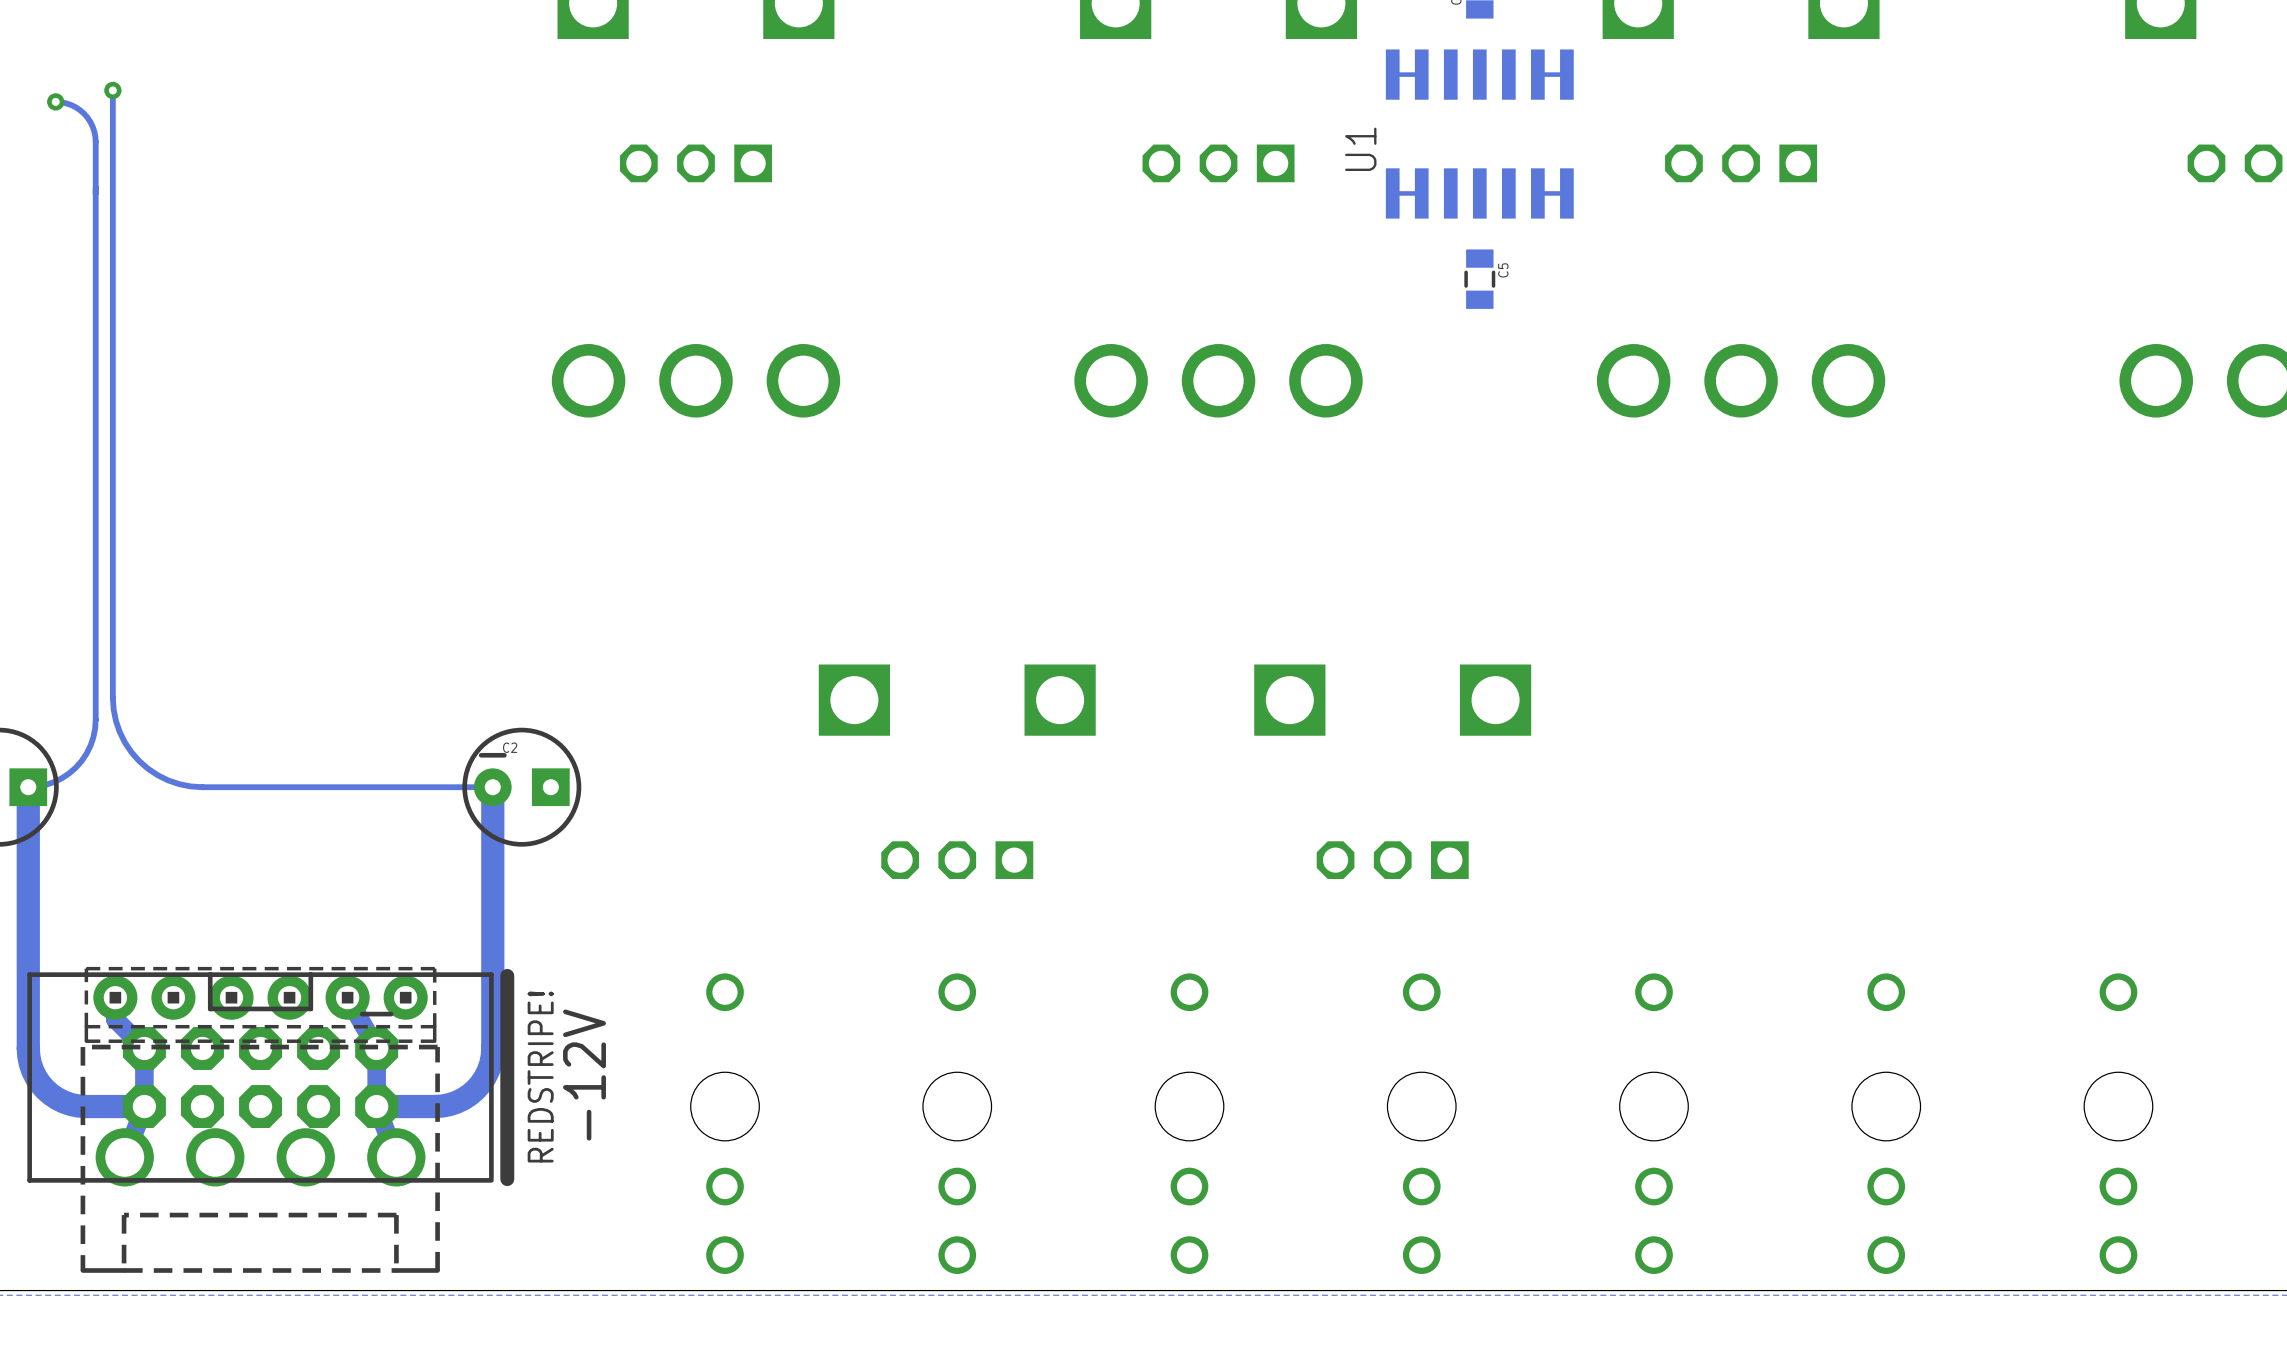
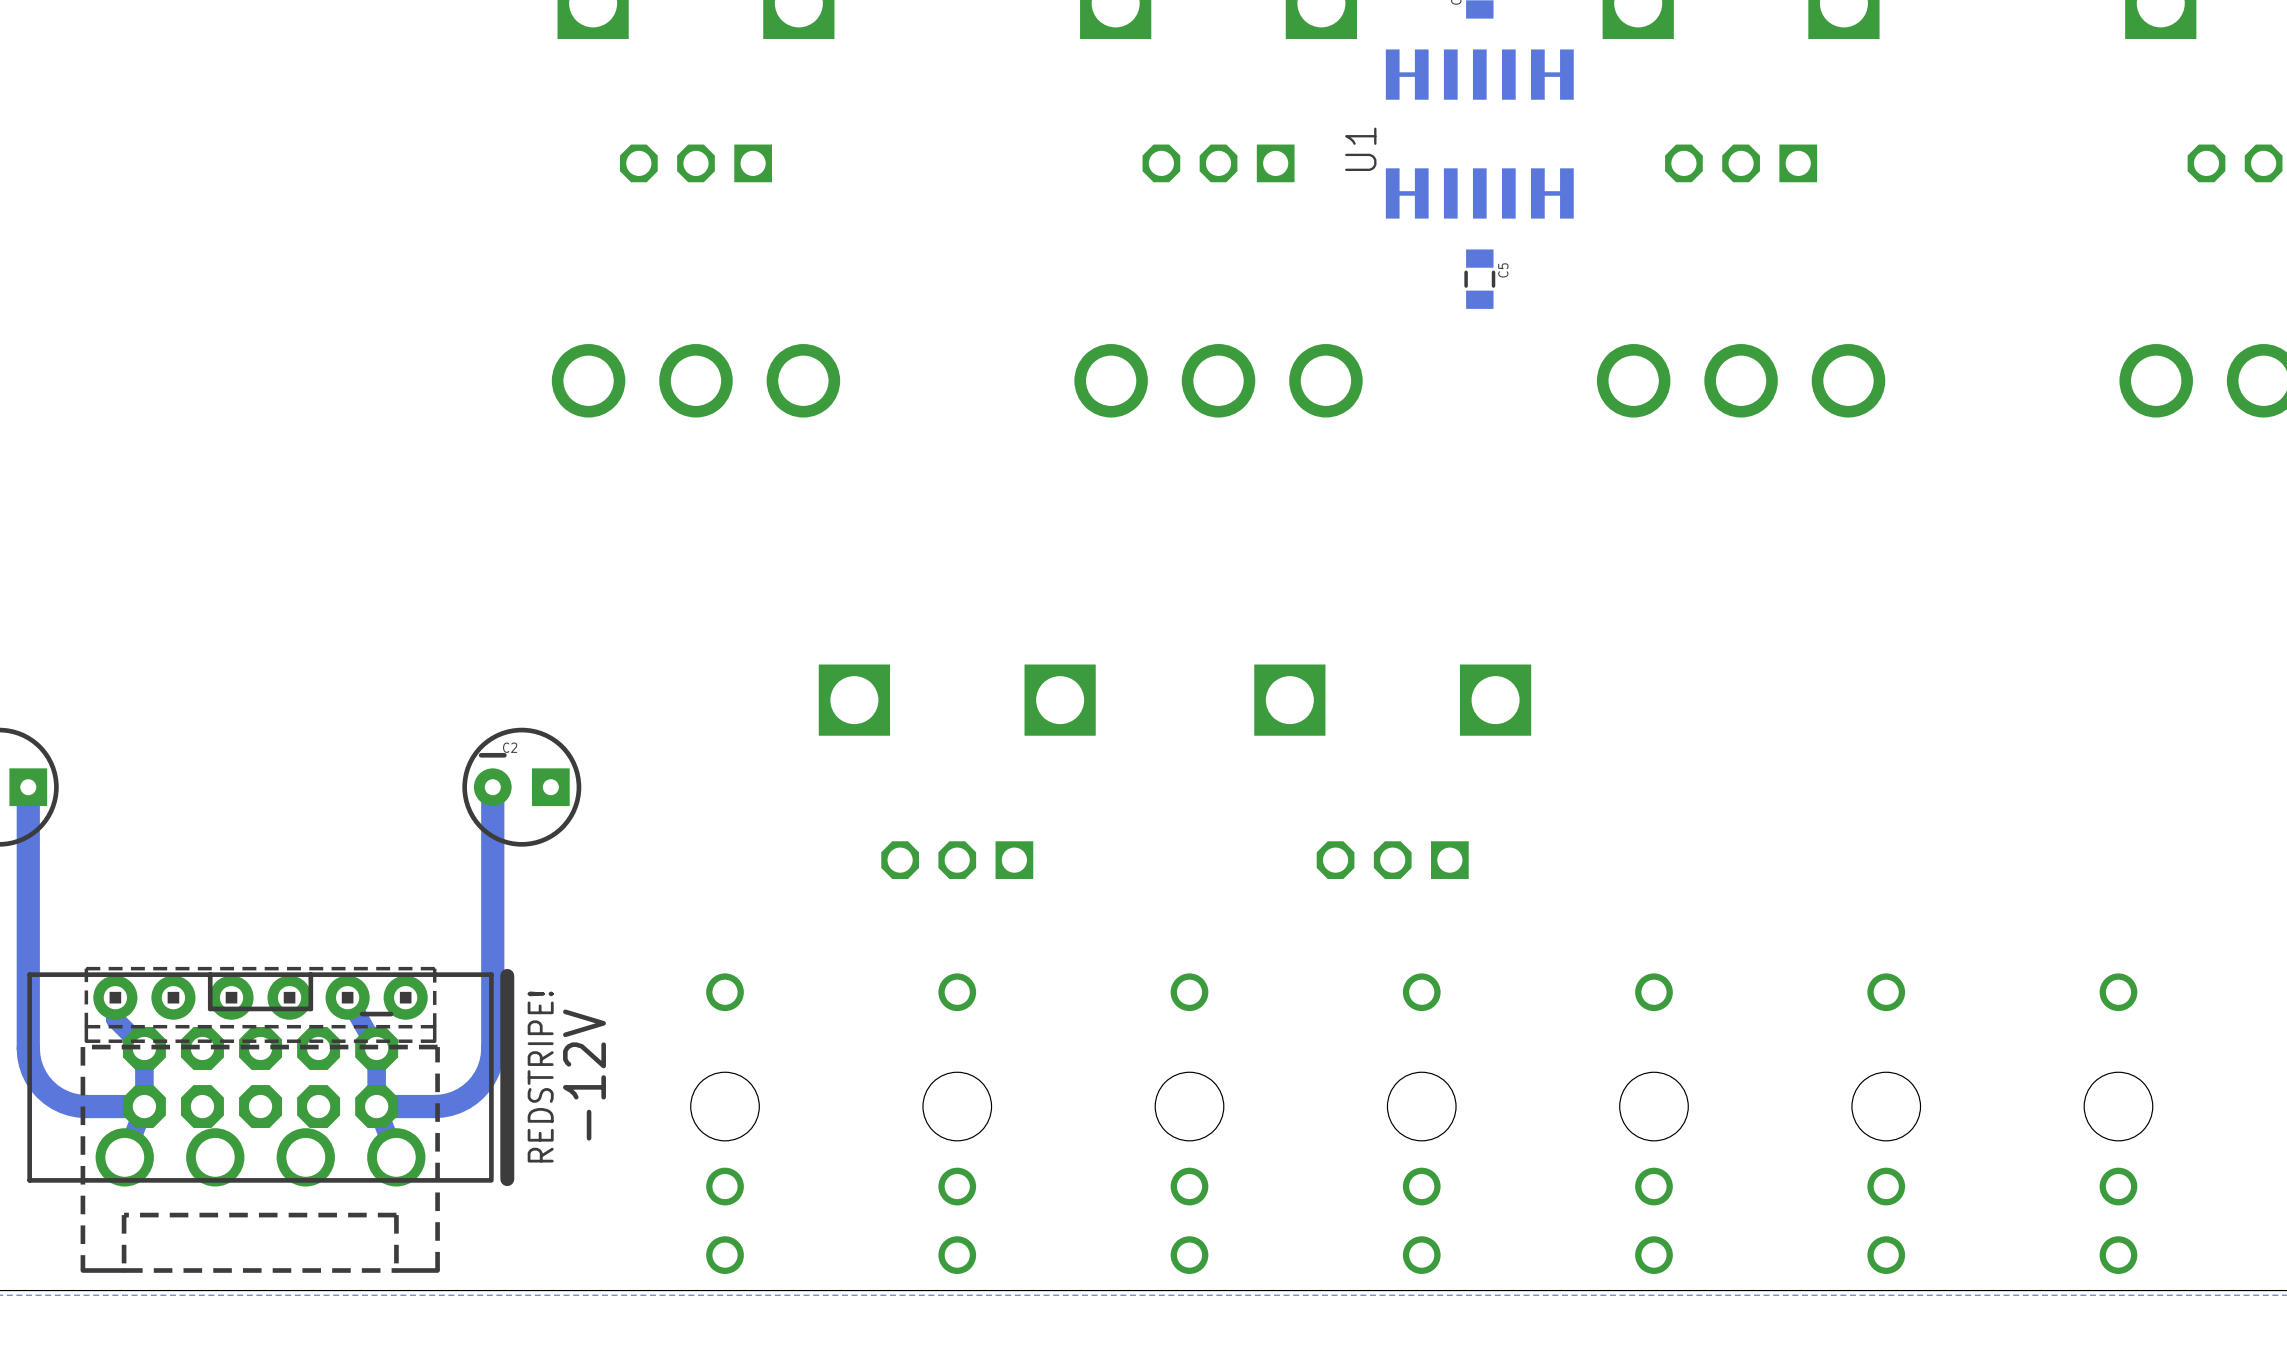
track: (112, 90) (112, 697) (115, 720) (124, 742) (131, 752) (147, 768) (168, 780) (190, 786) (492, 787) -> none
via: (112, 90) -> none
track: (55, 101) (71, 104) (84, 113) (92, 126) (95, 141) (95, 719) (90, 745) (75, 767) (54, 782) (28, 787) -> none
via: (55, 101) -> none

